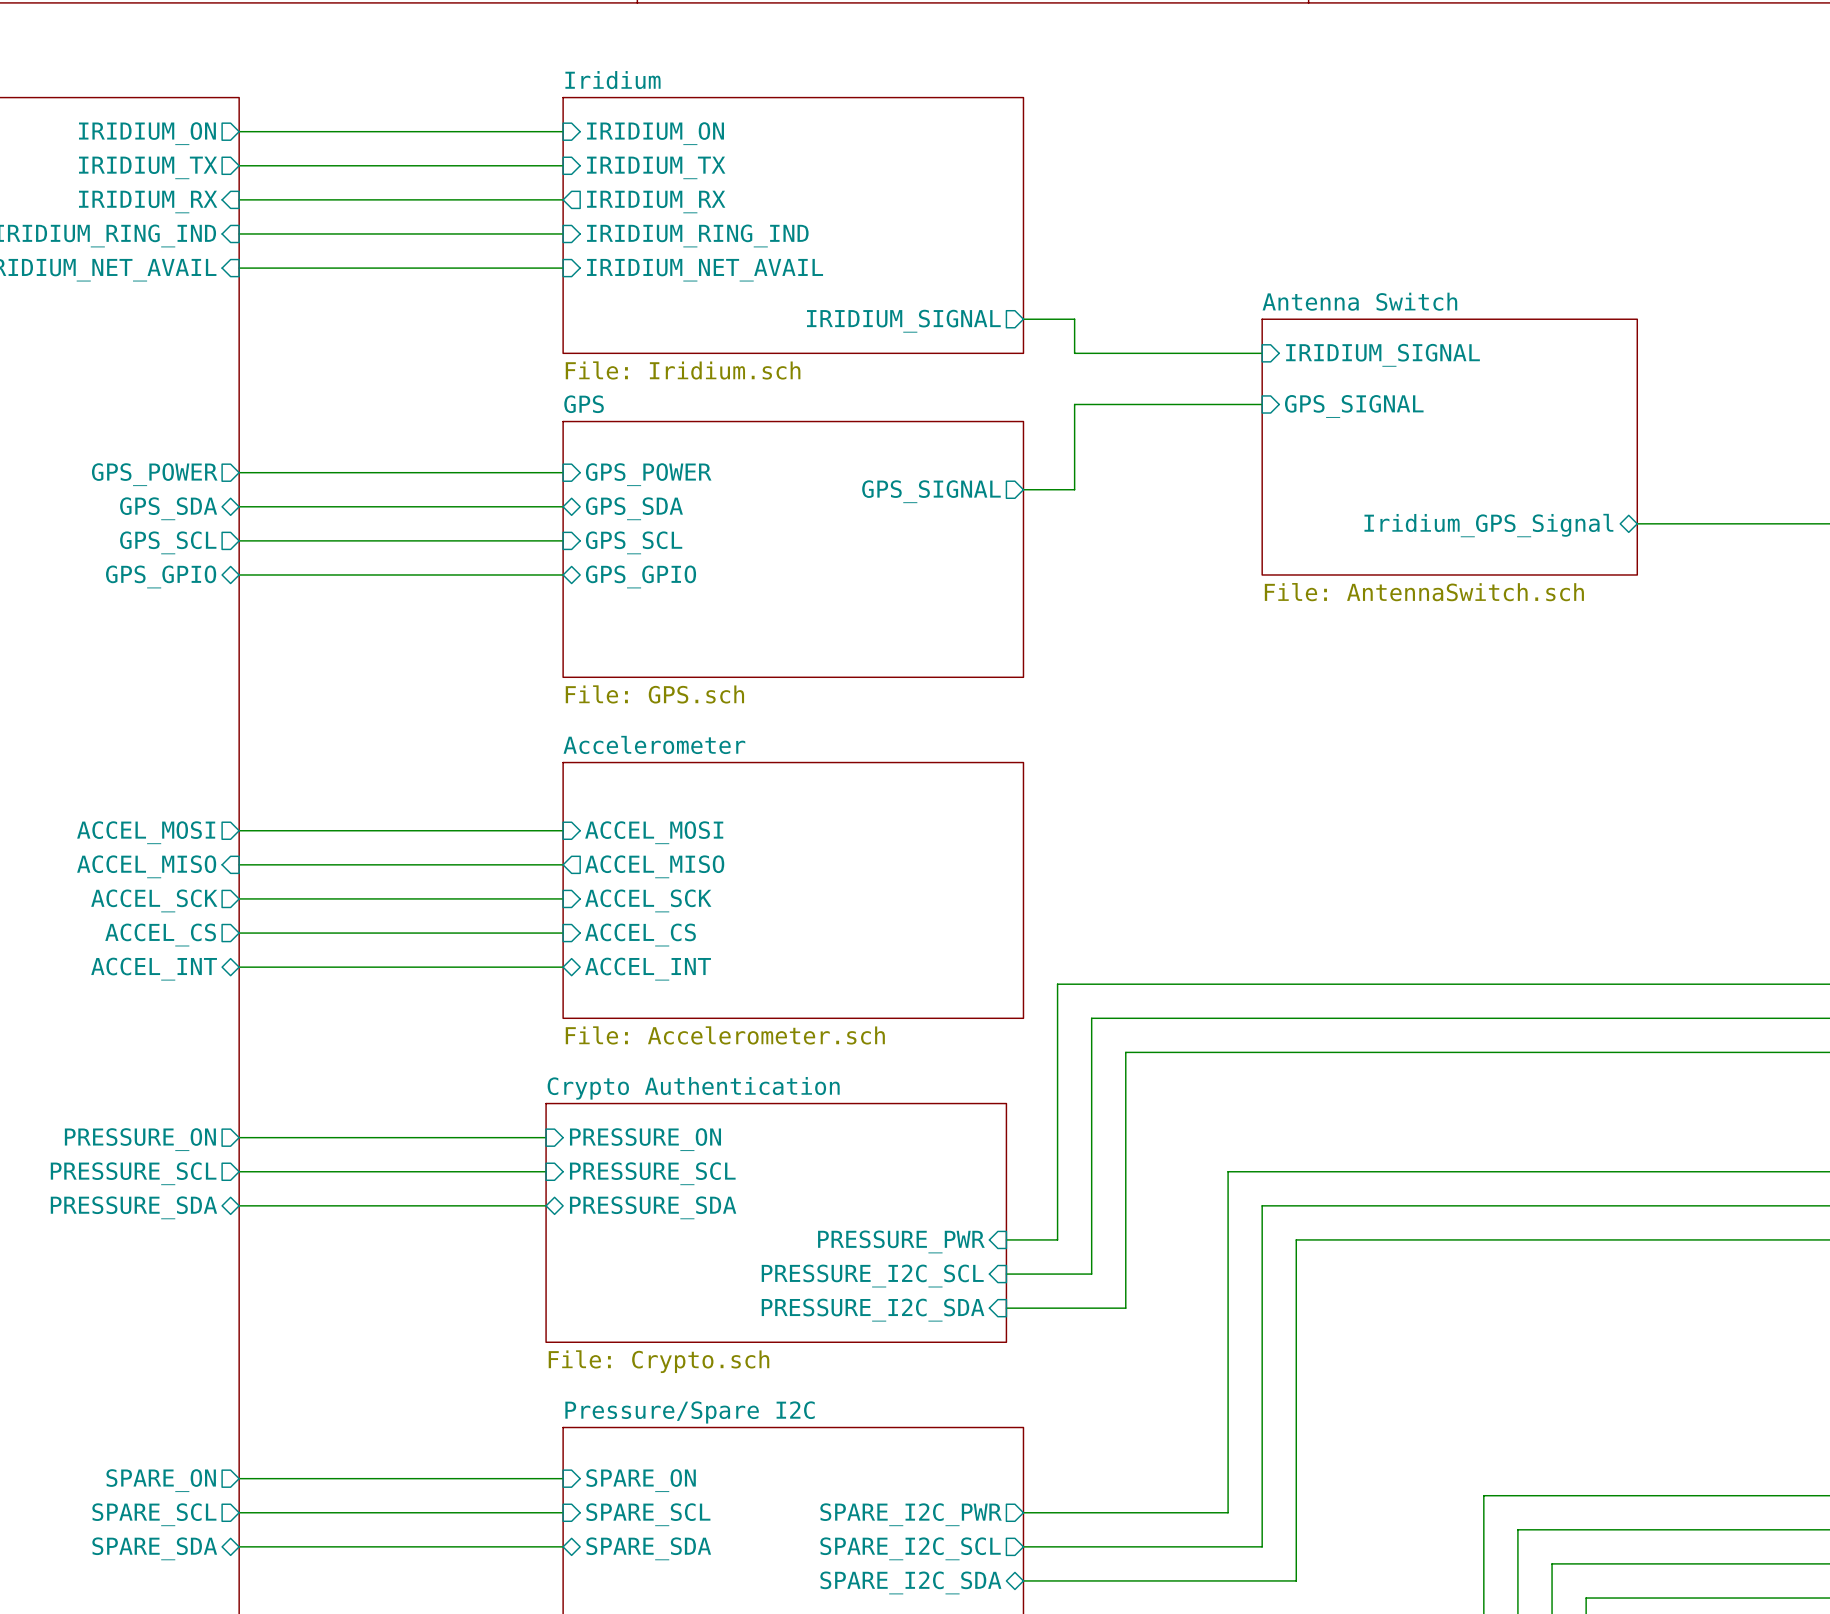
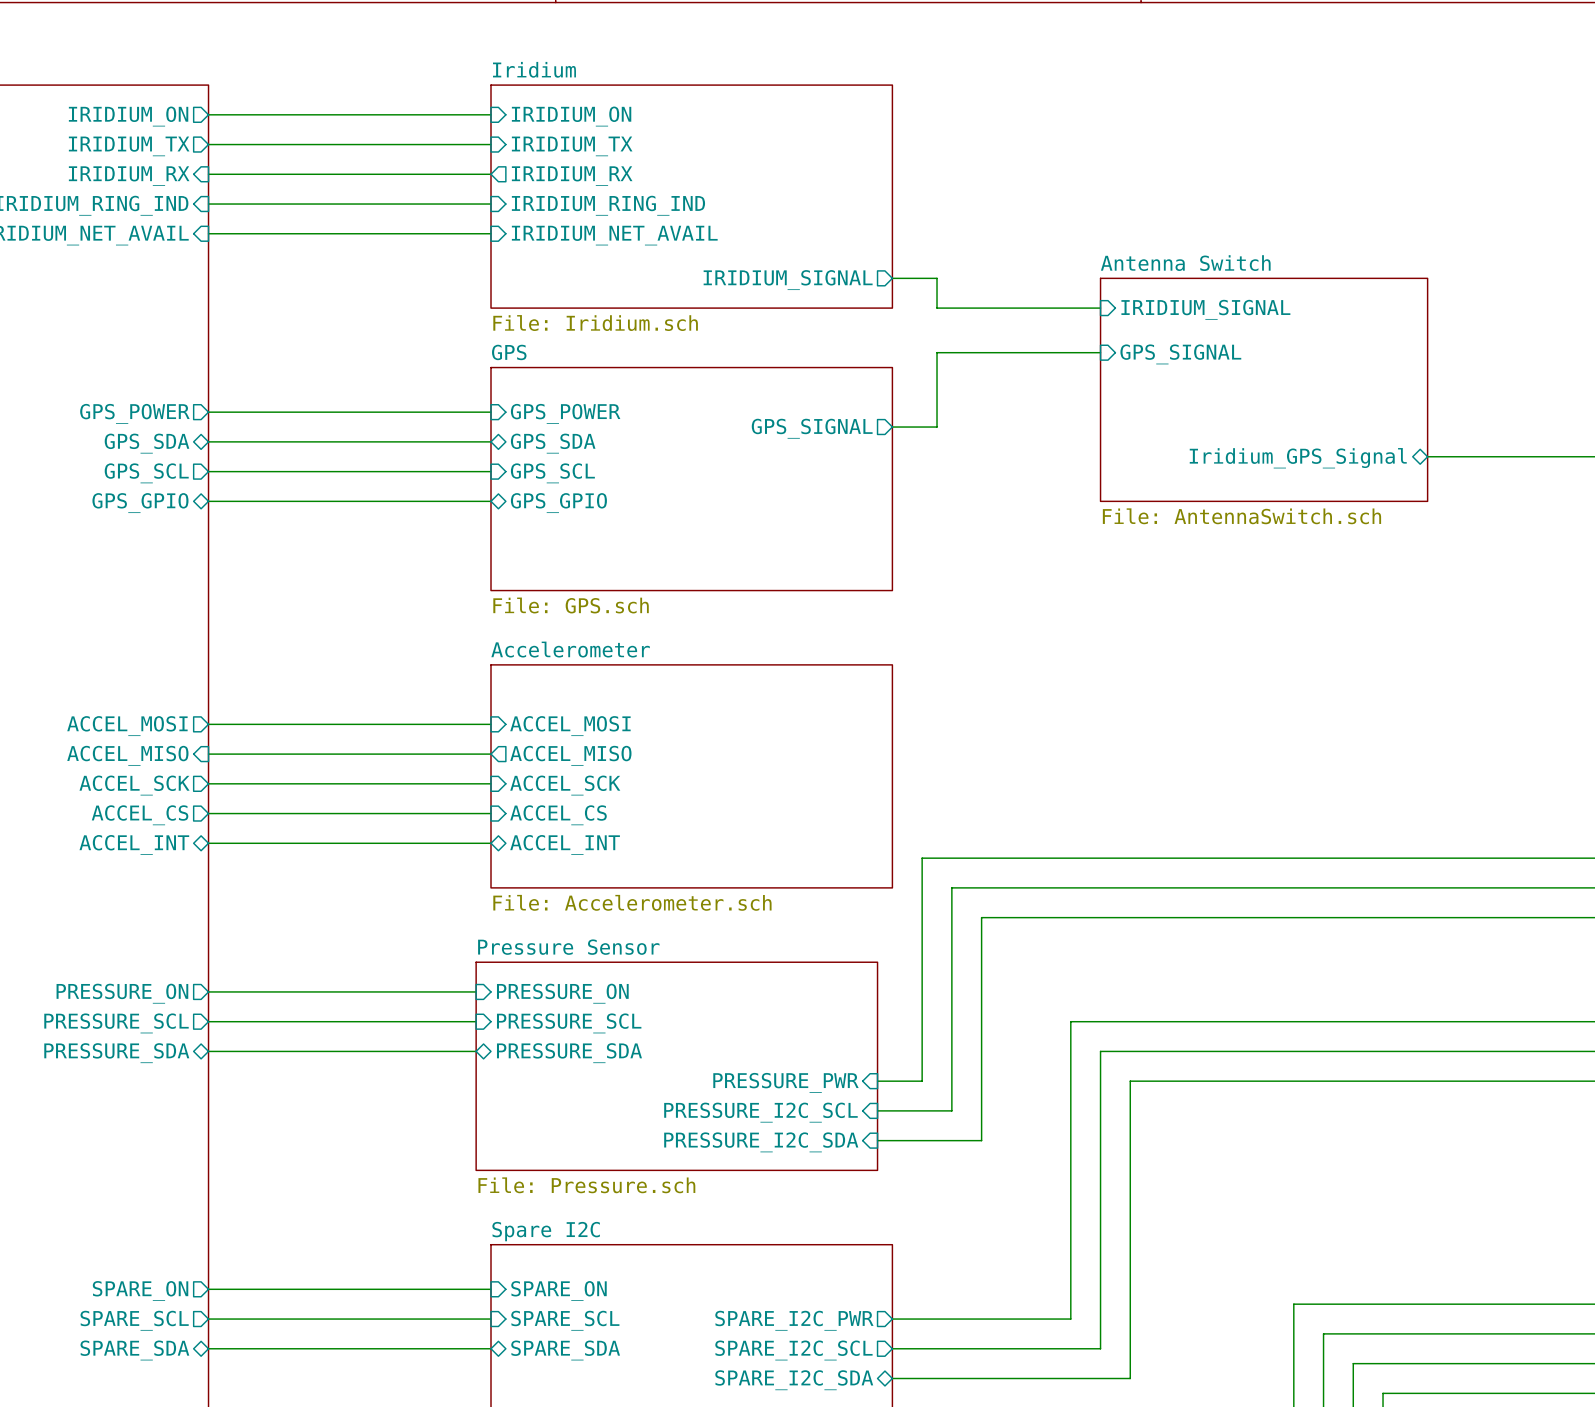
sheet Crypto Authentication name: Crypto Authentication (693, 1088) -> Pressure Sensor (568, 947)
sheet Crypto Authentication value: File: Crypto.sch (658, 1361) -> File: Pressure.sch (586, 1185)
sheet Pressure/Spare I2C name: Pressure/Spare I2C (690, 1412) -> Spare I2C (546, 1231)

